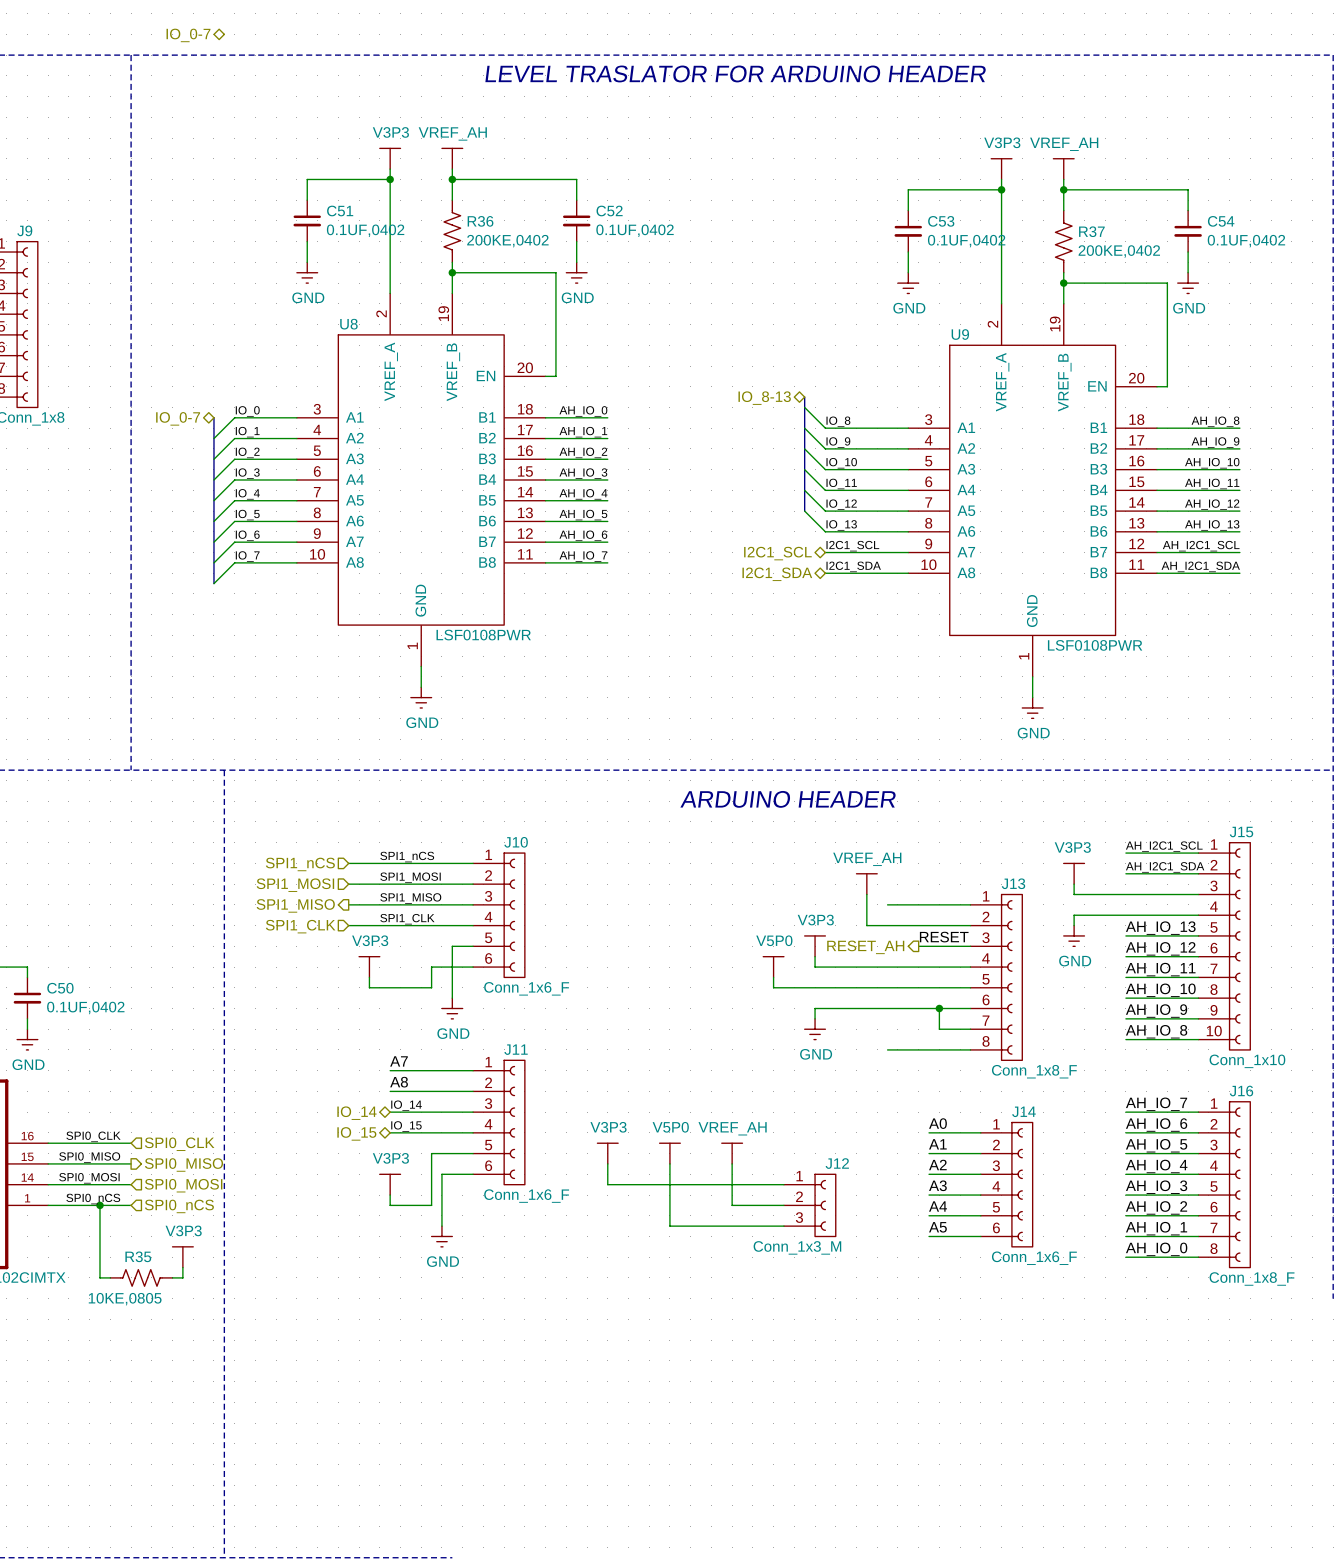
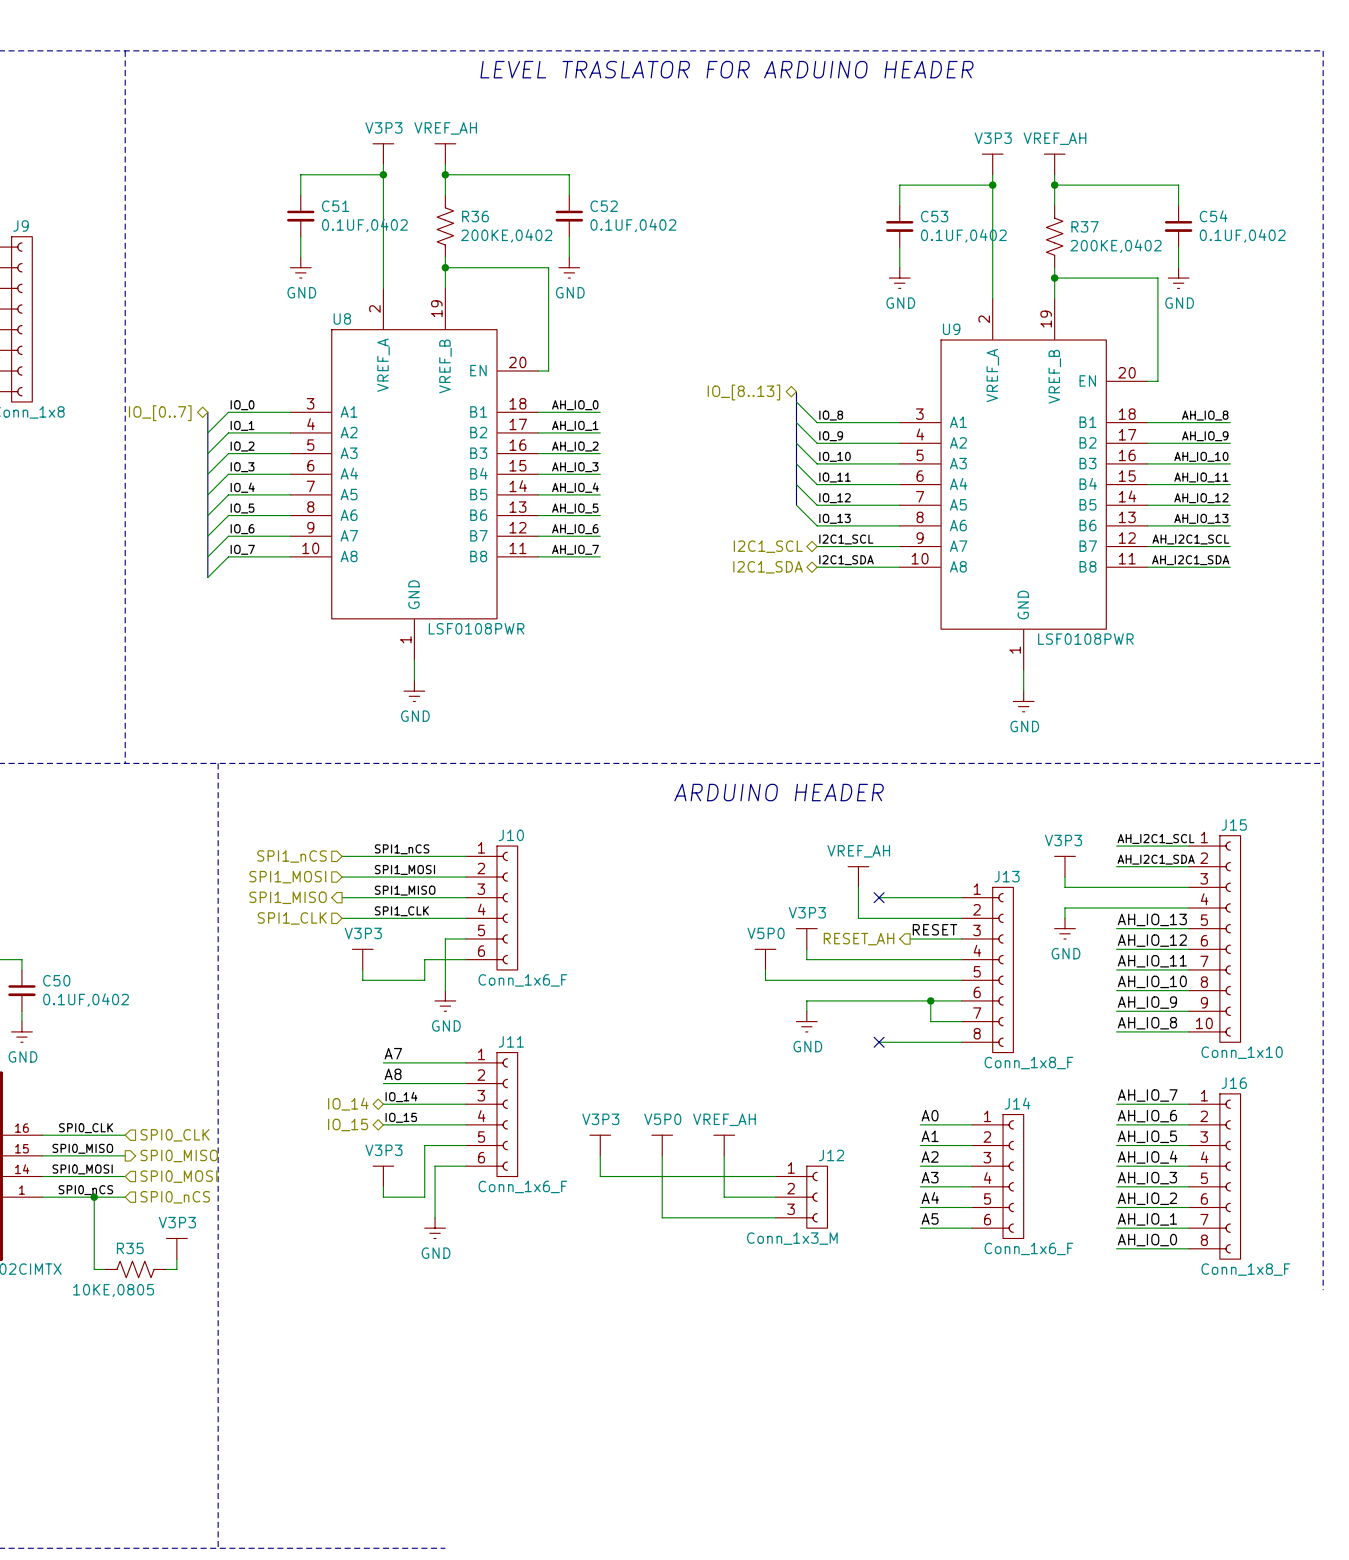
hierarchical label: IO_0-7 (188, 35) -> none
hierarchical label: IO_8-13 (764, 398) -> IO_[8..13] (743, 392)
hierarchical label: IO_0-7 (178, 418) -> IO_[0..7] (160, 413)
no-connect mark: none -> (879, 897)
no-connect mark: none -> (879, 1042)

